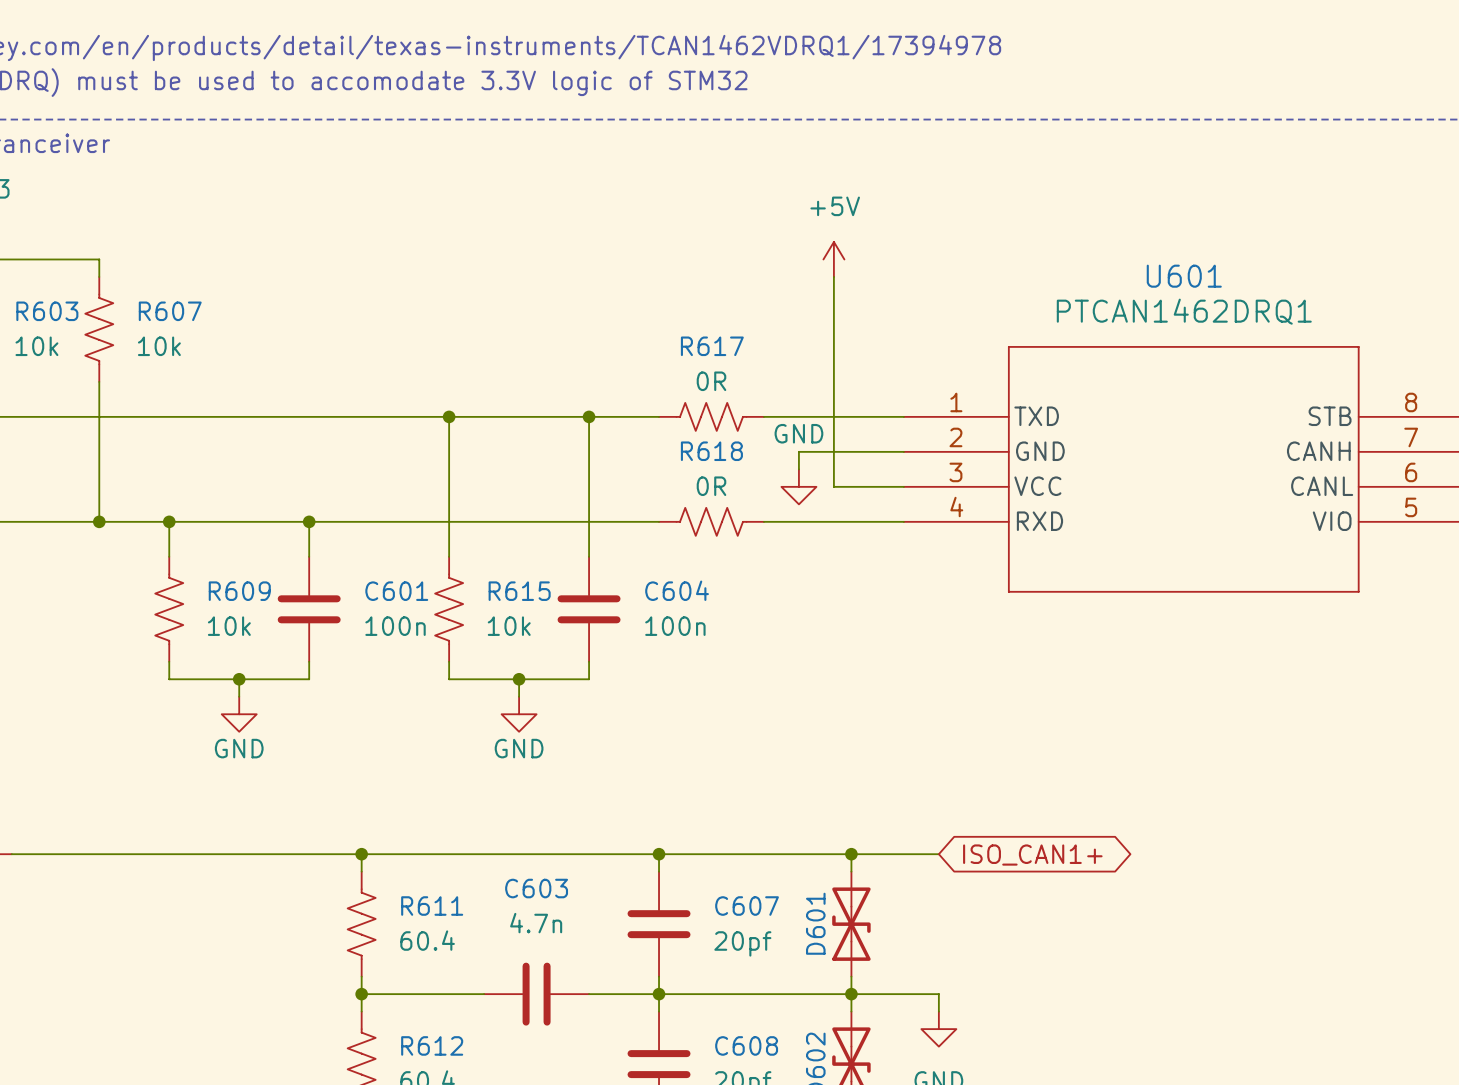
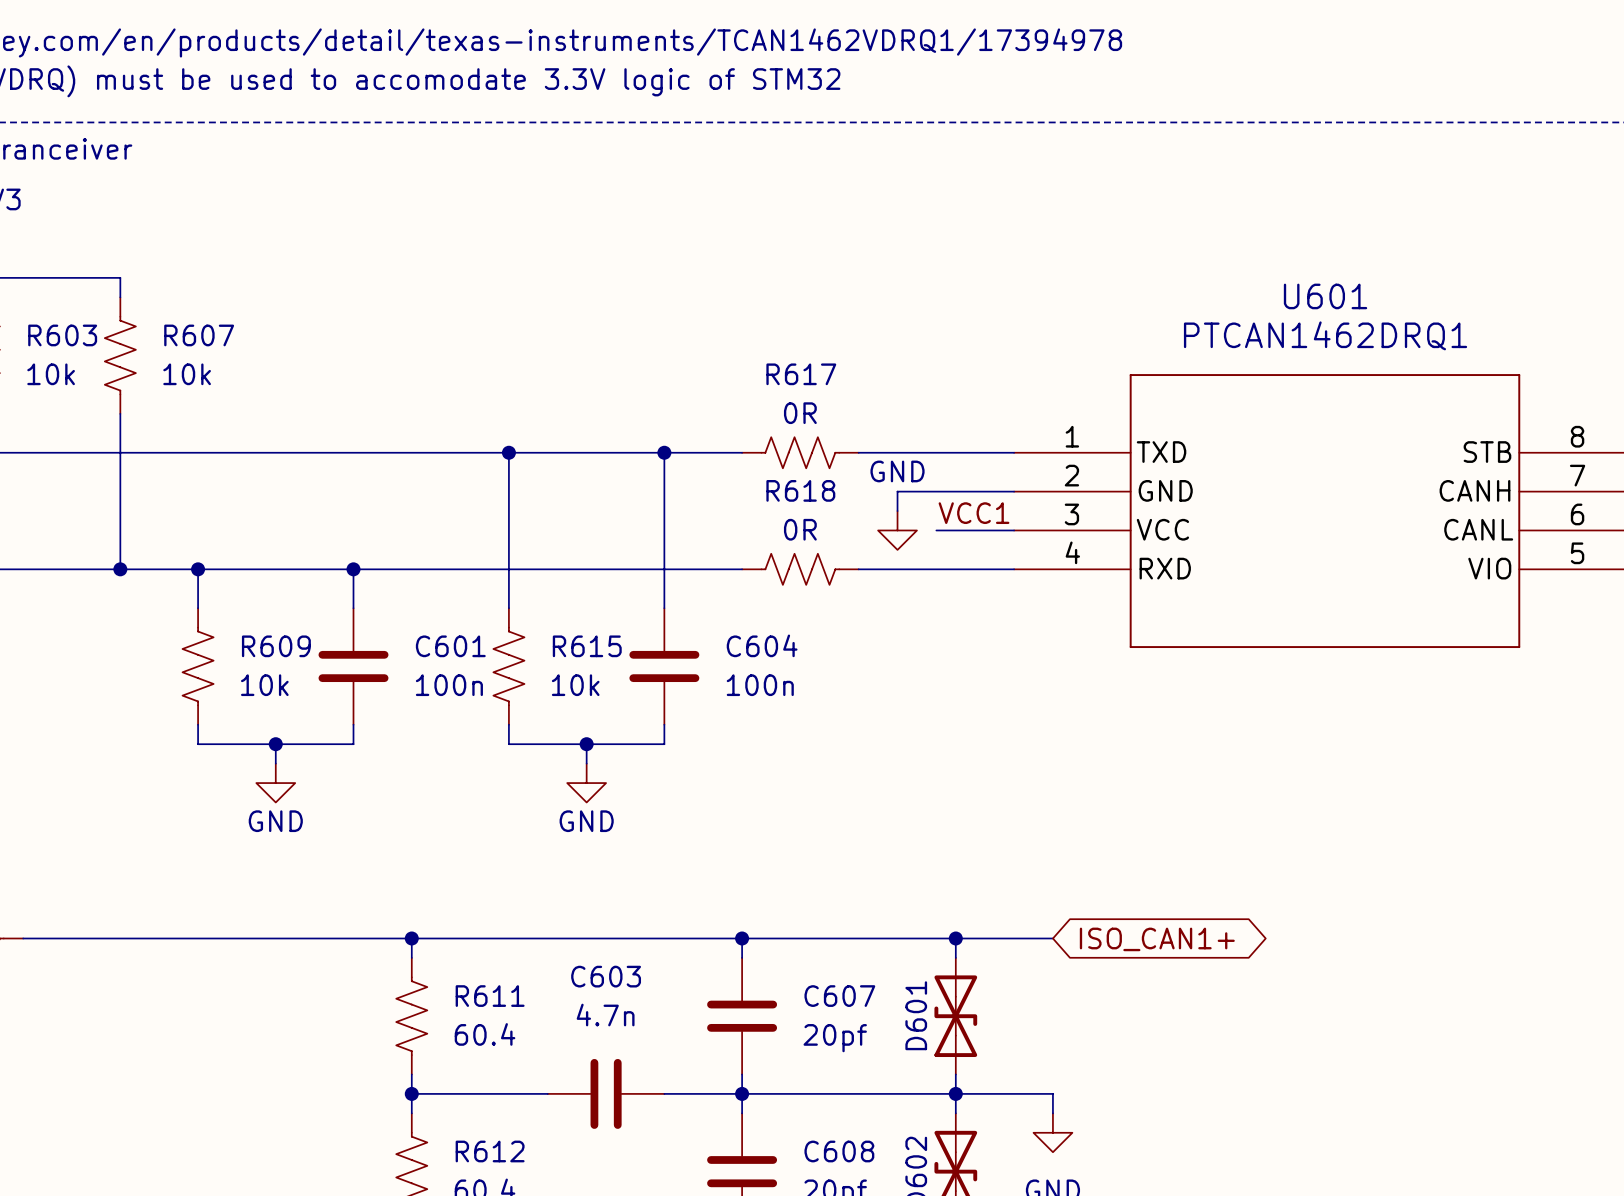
power symbol: +5V (833, 259) -> none
wire: (833, 276) (833, 486) -> none
label: none -> VCC1 (974, 513)

